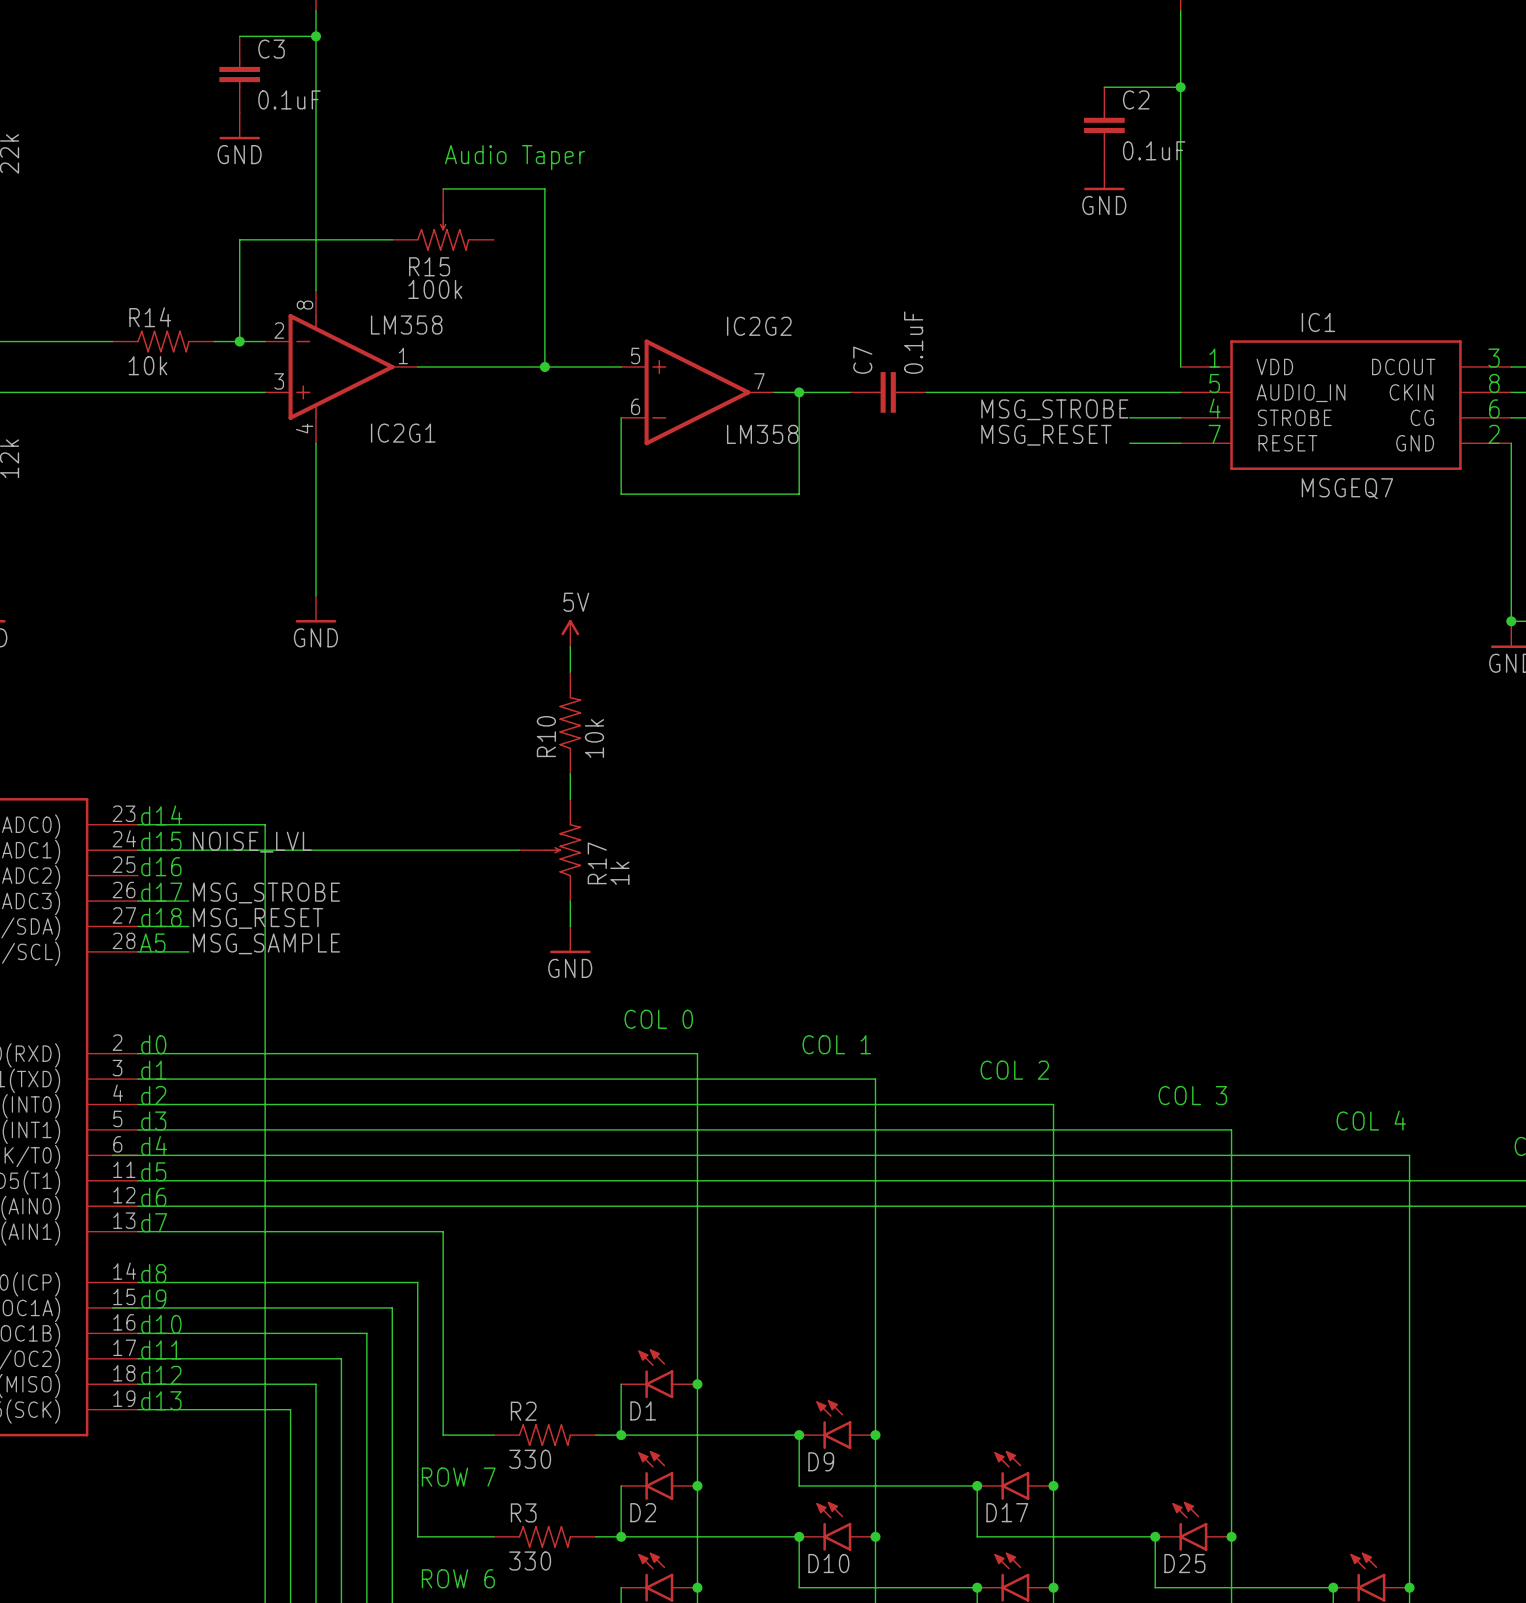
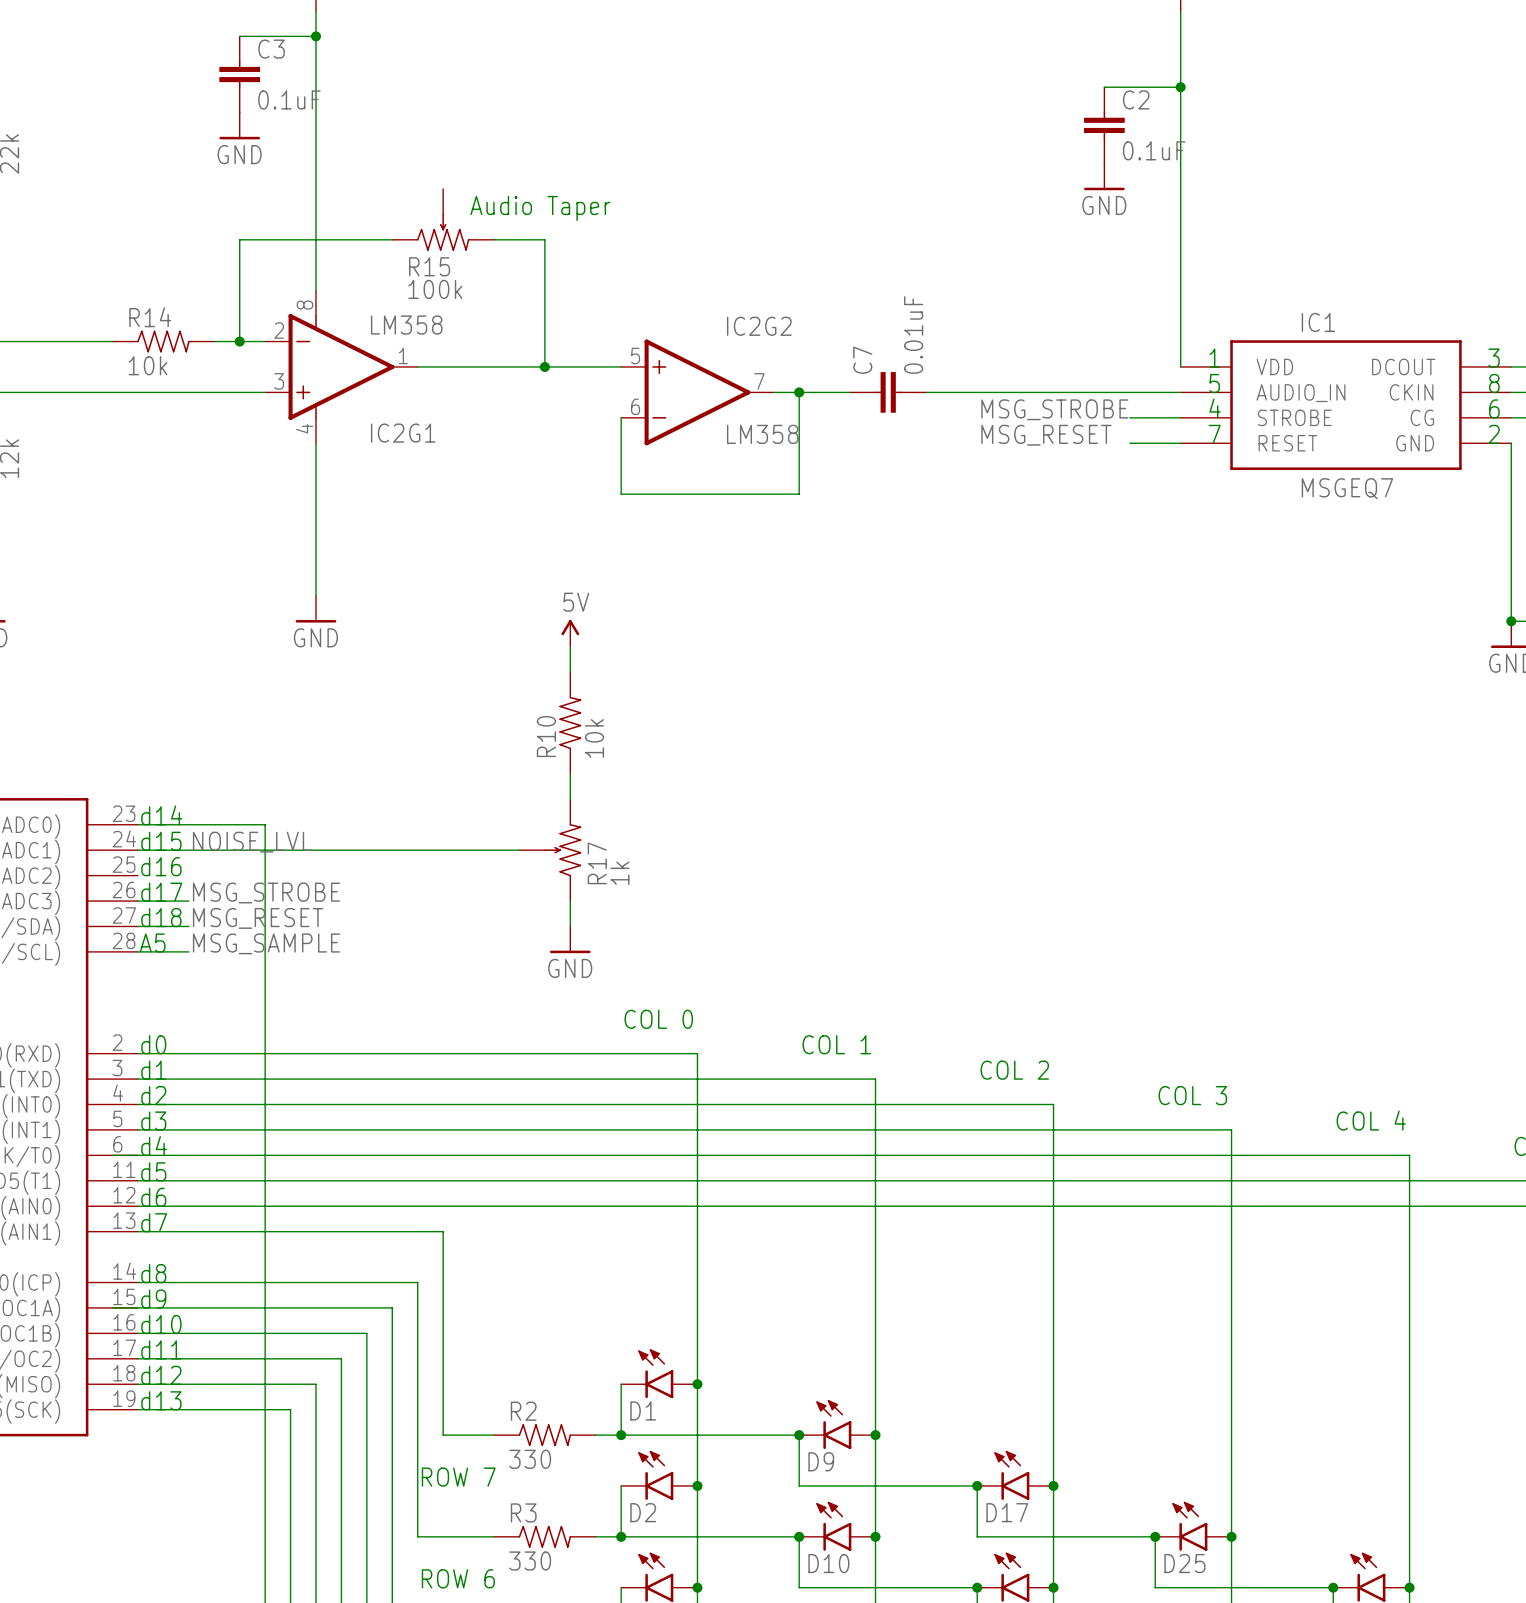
text position: Audio Taper (515, 157) -> Audio Taper (540, 208)
wire: (443, 188) (544, 188) (544, 239) -> (494, 239) (544, 239)
C7 value: 0.1uF (913, 342) -> 0.01uF (913, 335)

